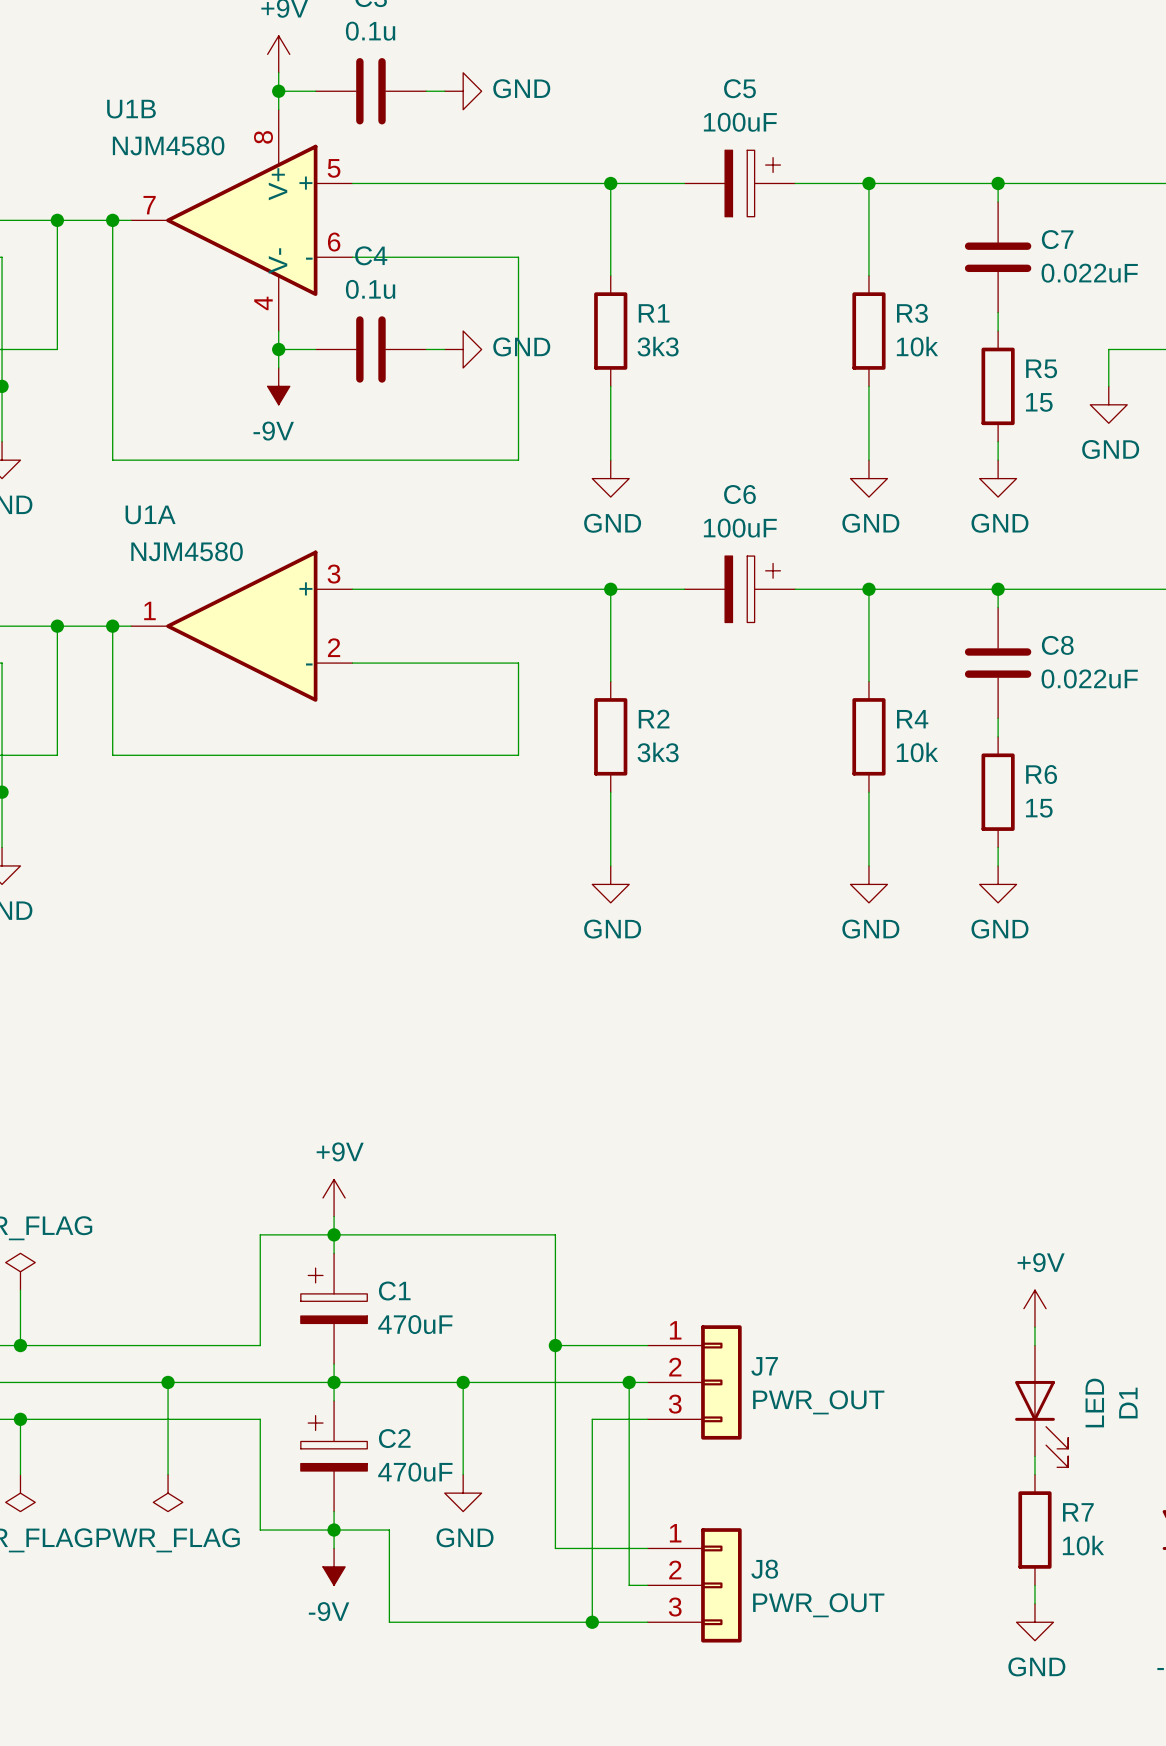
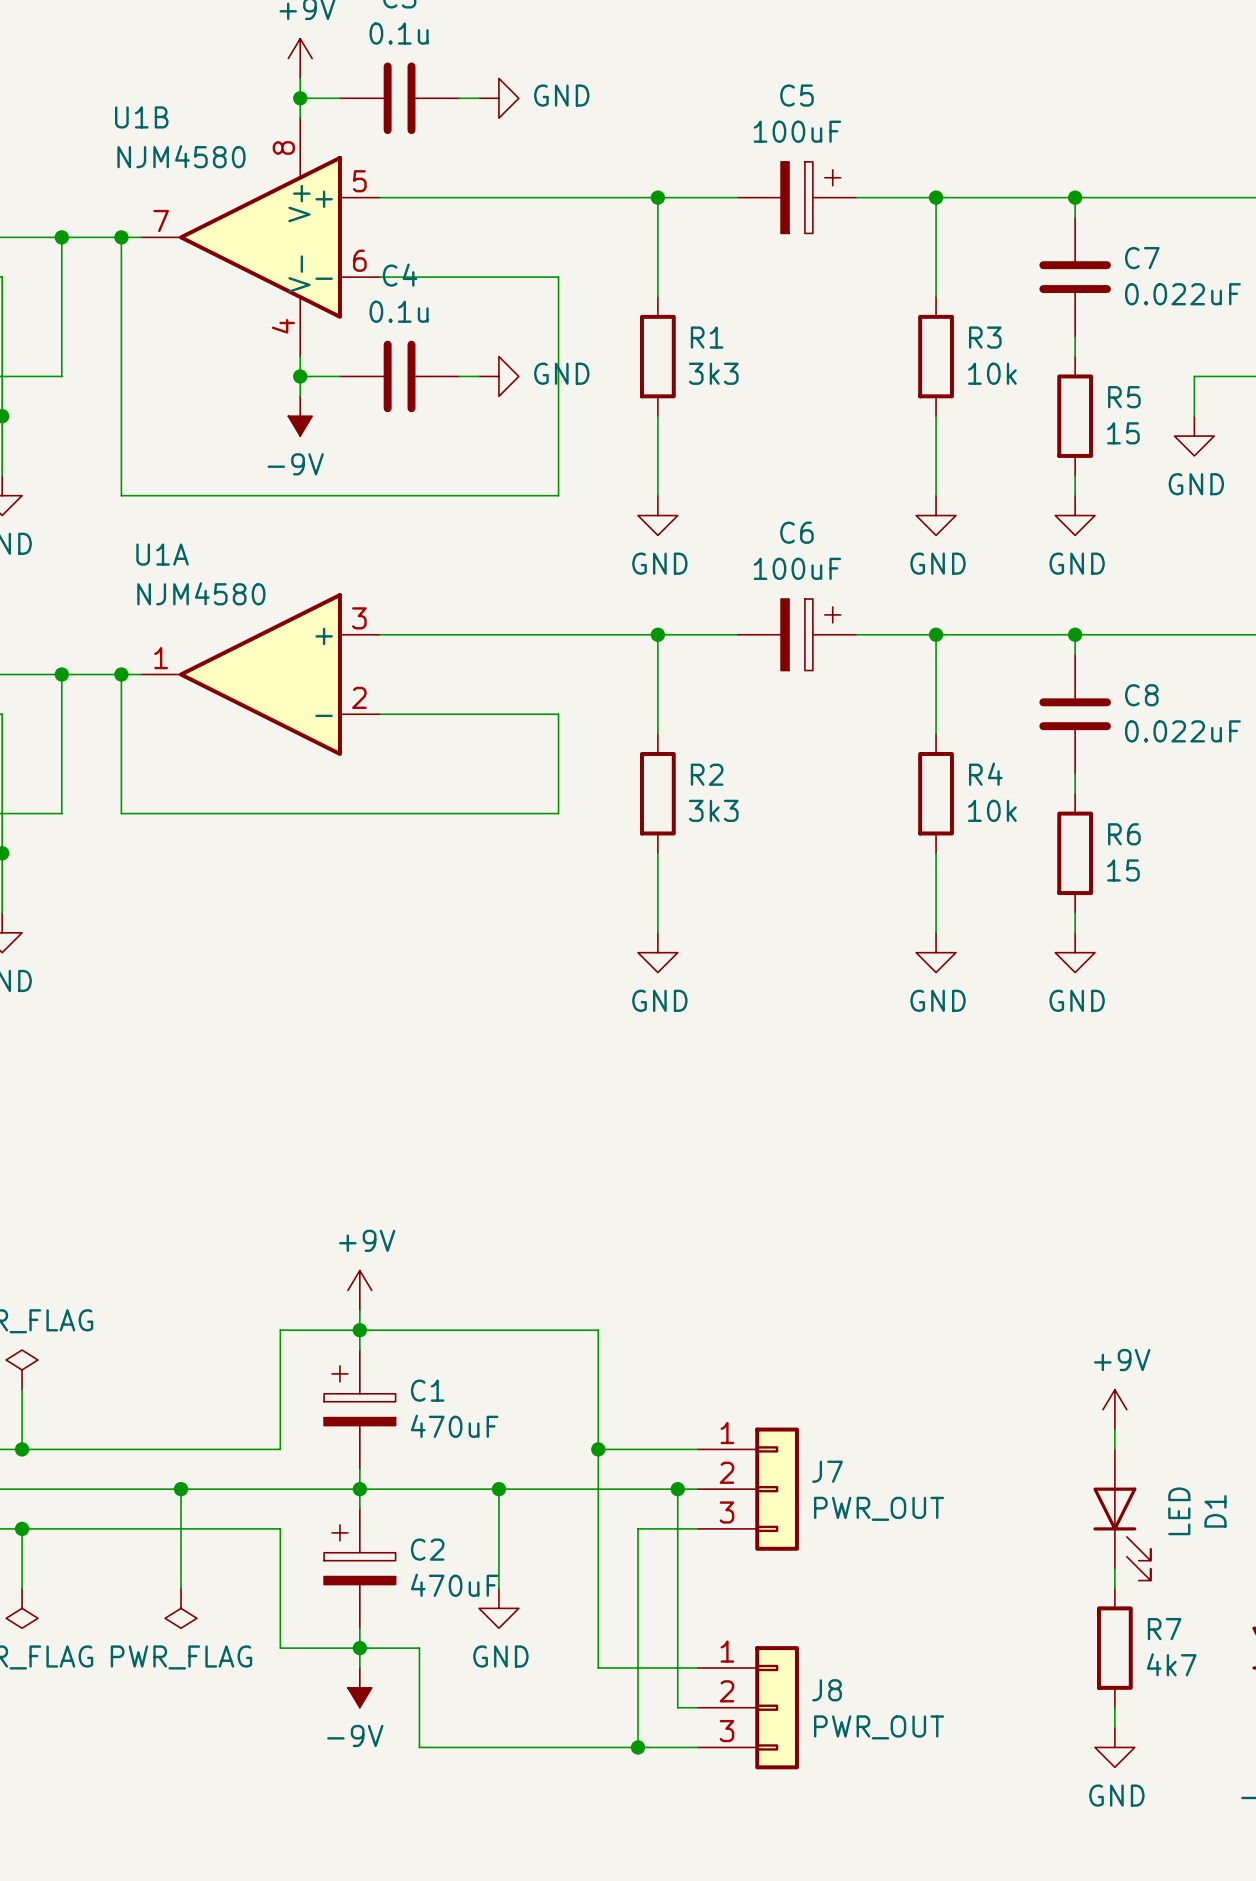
R7 value: 10k (1083, 1545) -> 4k7 (1171, 1664)

